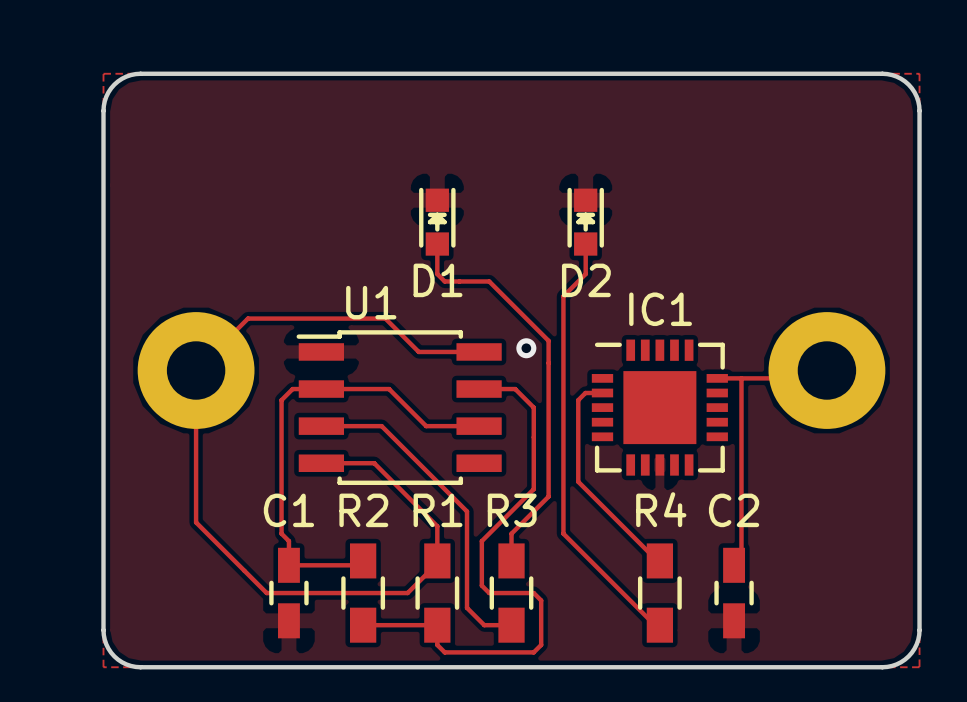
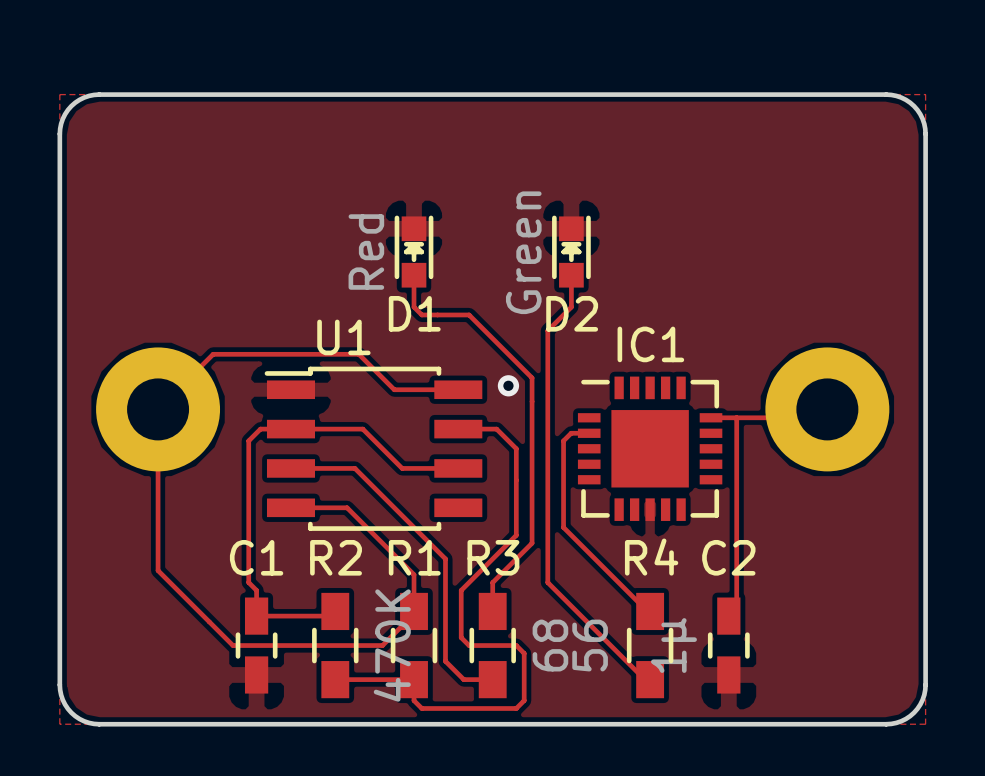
D1 value: none -> Red (366, 252)
D2 value: none -> Green (523, 252)
R2 value: none -> 470K (392, 645)
R3 value: none -> 68 (550, 645)
R4 value: none -> 56 (590, 645)
C2 value: none -> 1µ (673, 645)

